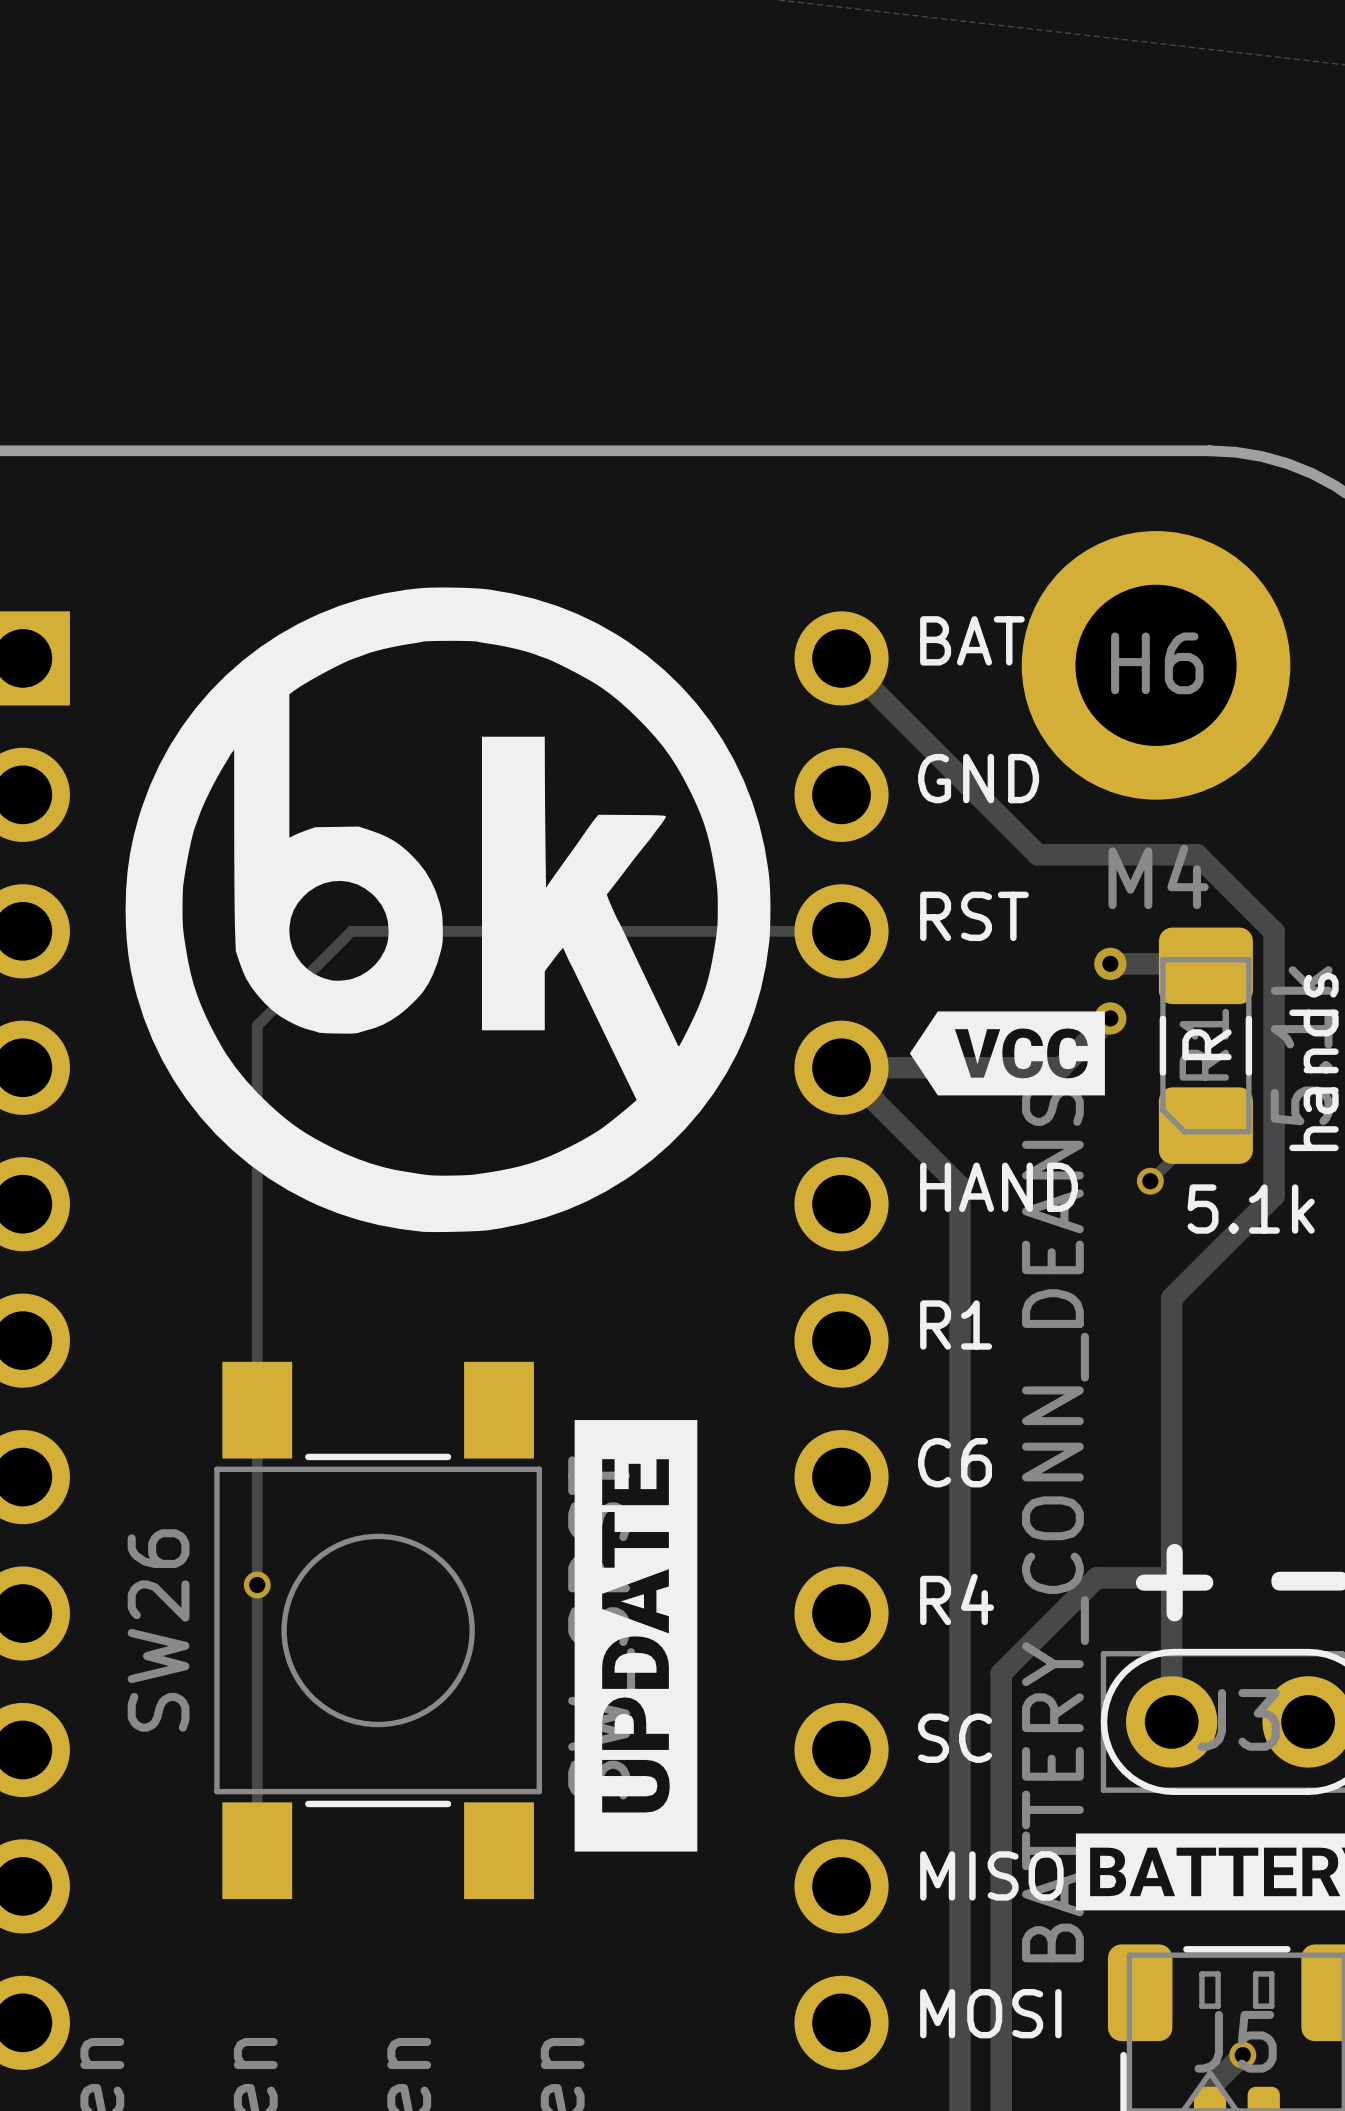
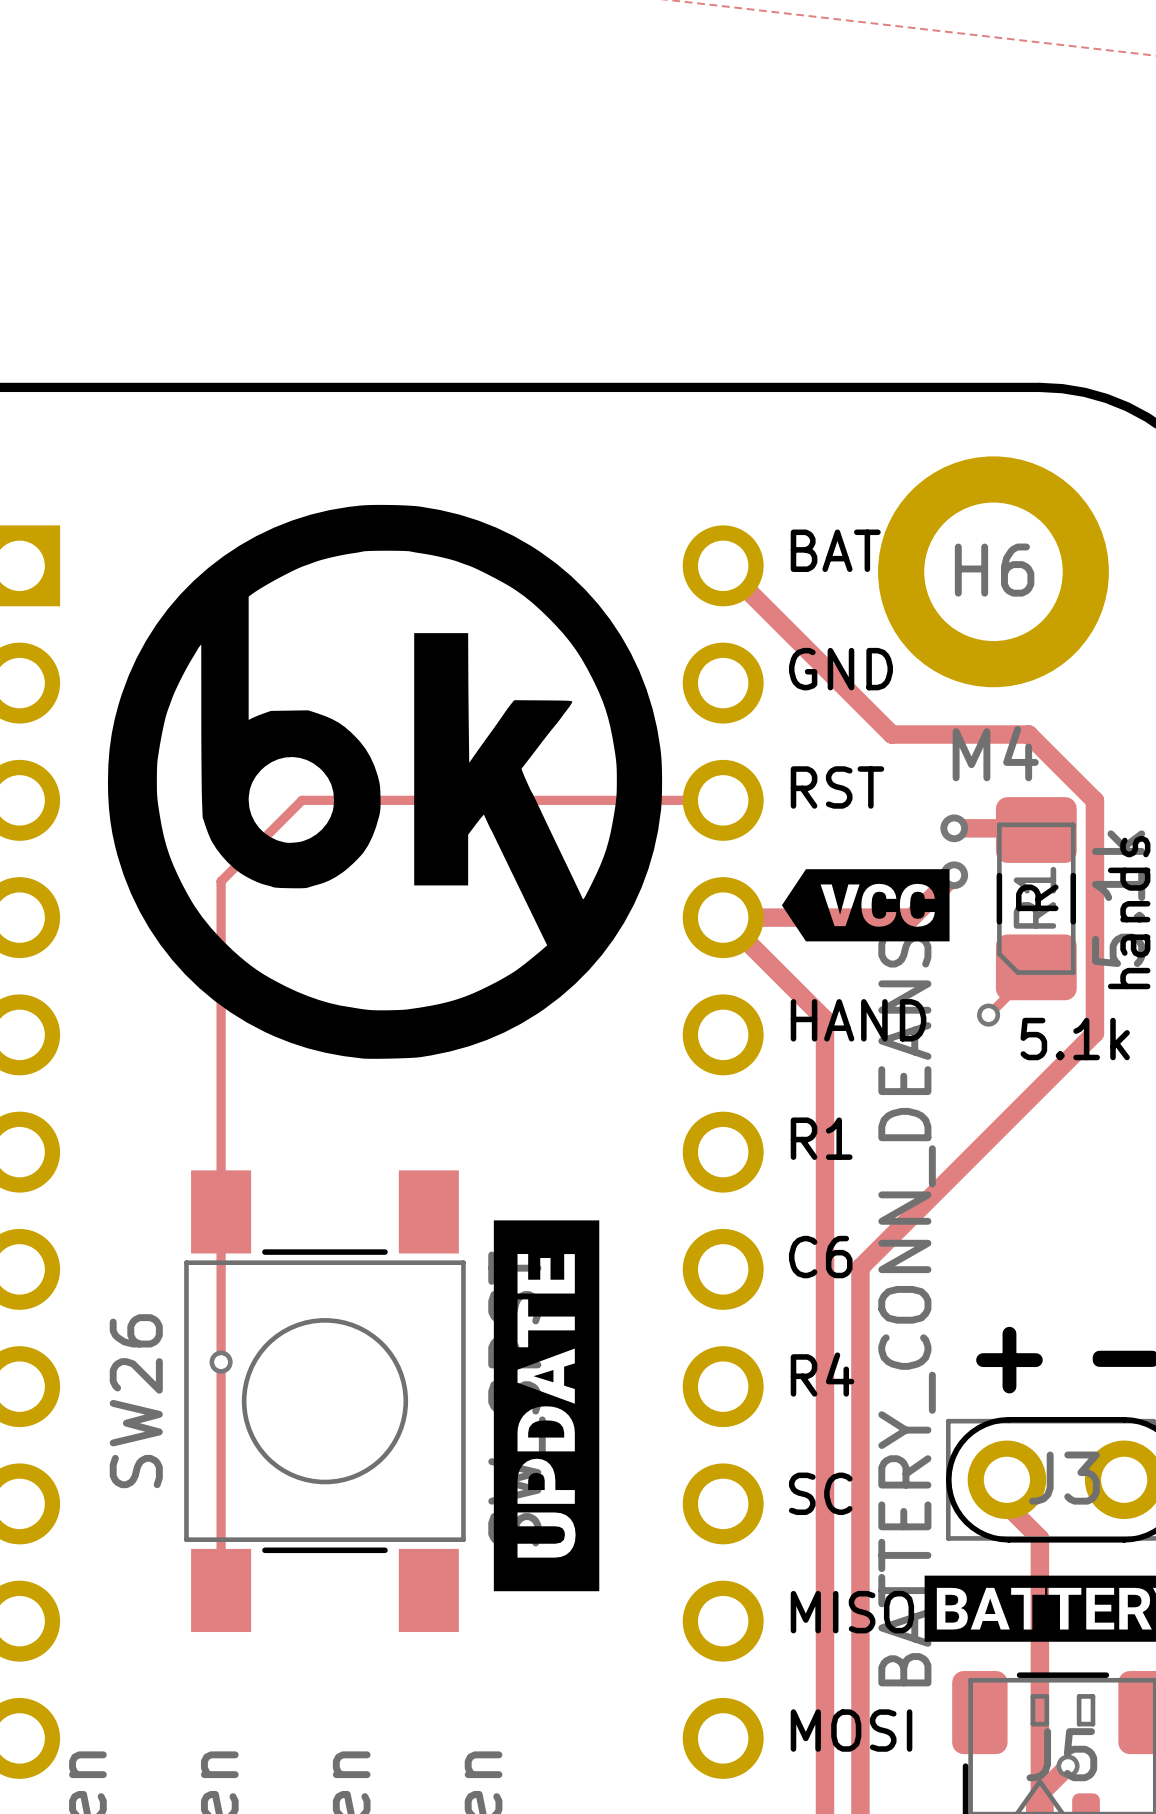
track: (1274, 1195) (1171, 1298) (1171, 1721) -> (1094, 1027) (1094, 1033) (860, 1267) (860, 1438)
track: (1171, 1584) (1164, 1577) (1096, 1577) (1001, 1673) -> none
track: none -> (1006, 1479) (1006, 1505) (1039, 1538) (1039, 1794)

